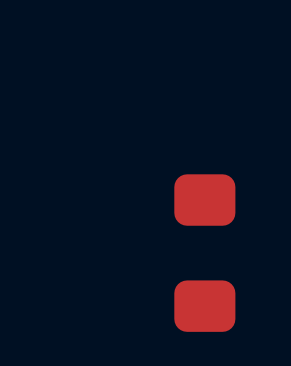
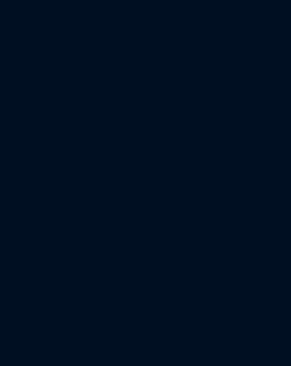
part: (204, 253) -> none

